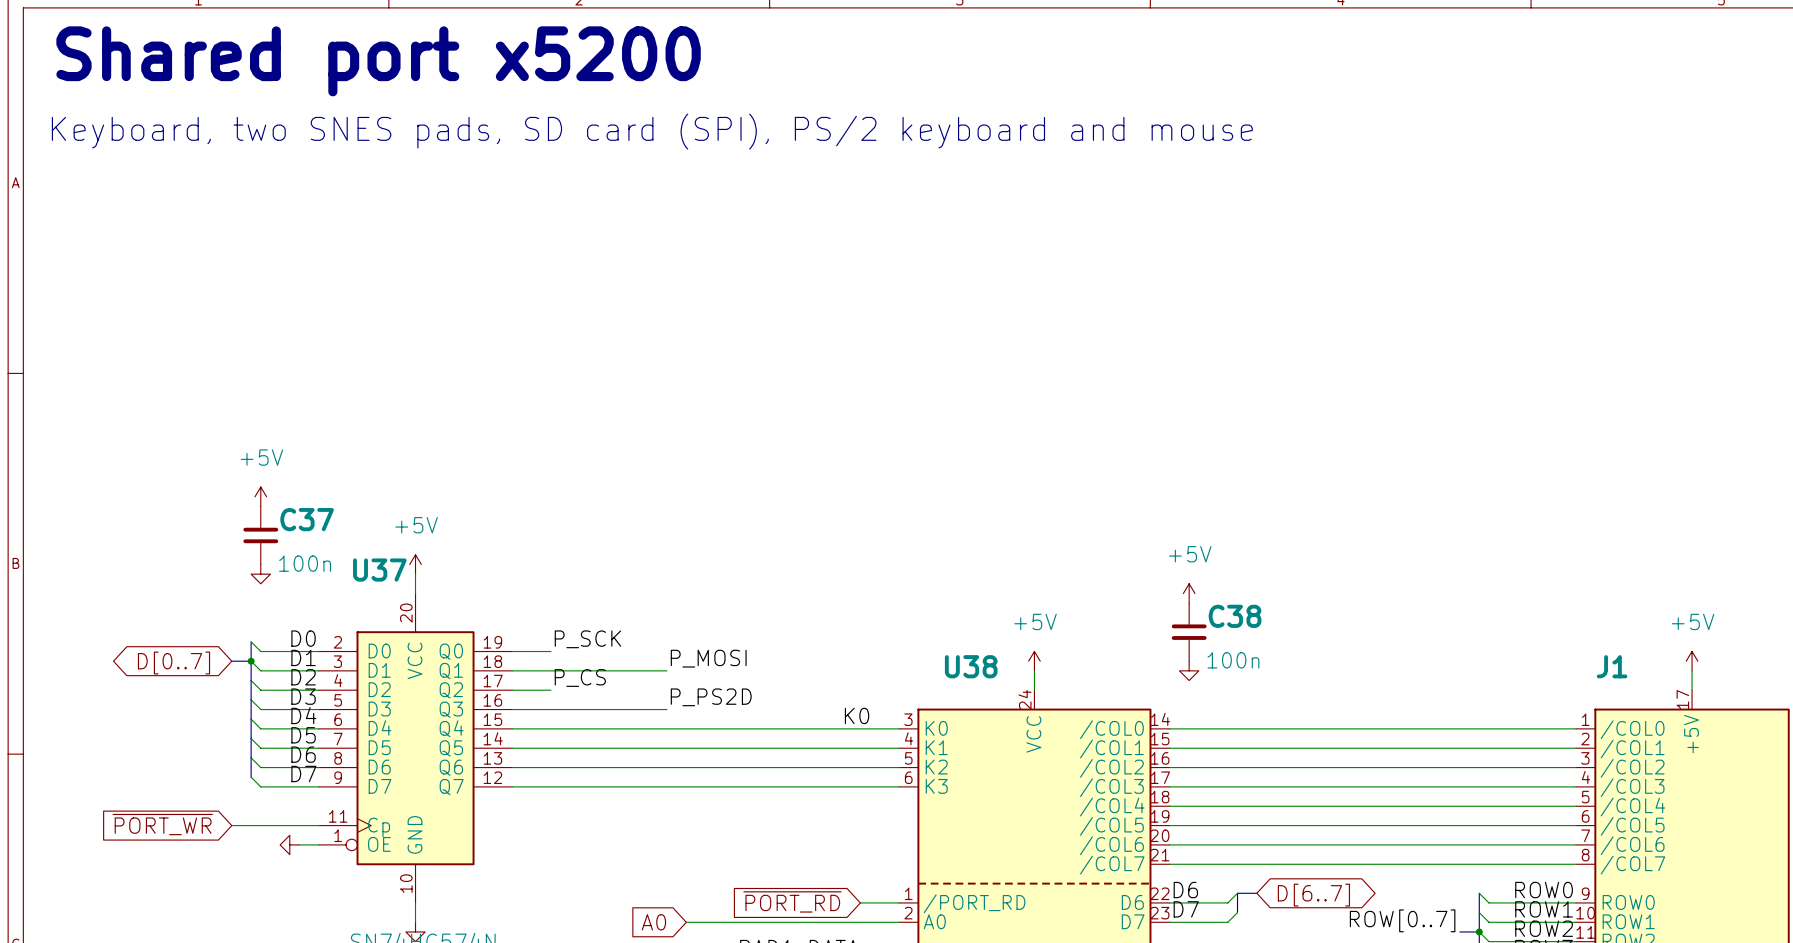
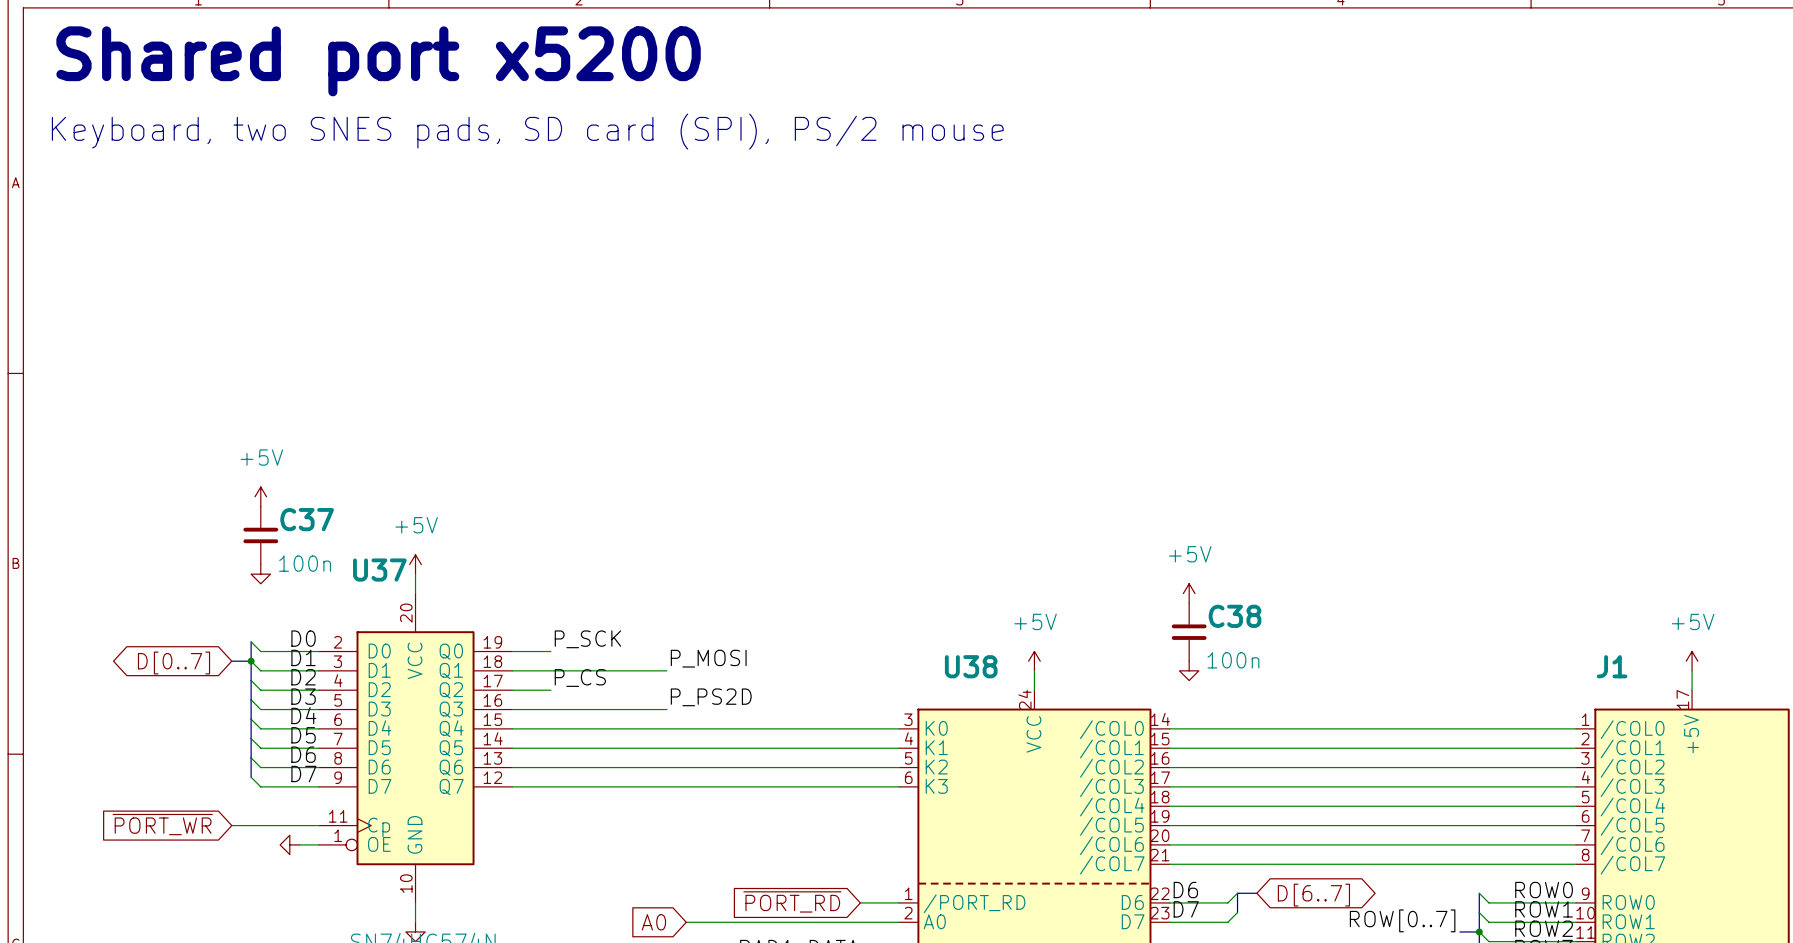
text: Keyboard, two SNES pads, SD card (SPI), PS/2 keyboard and mouse (652, 131) -> Keyboard, two SNES pads, SD card (SPI), PS/2 mouse (527, 131)
label: K0 (857, 715) -> none

